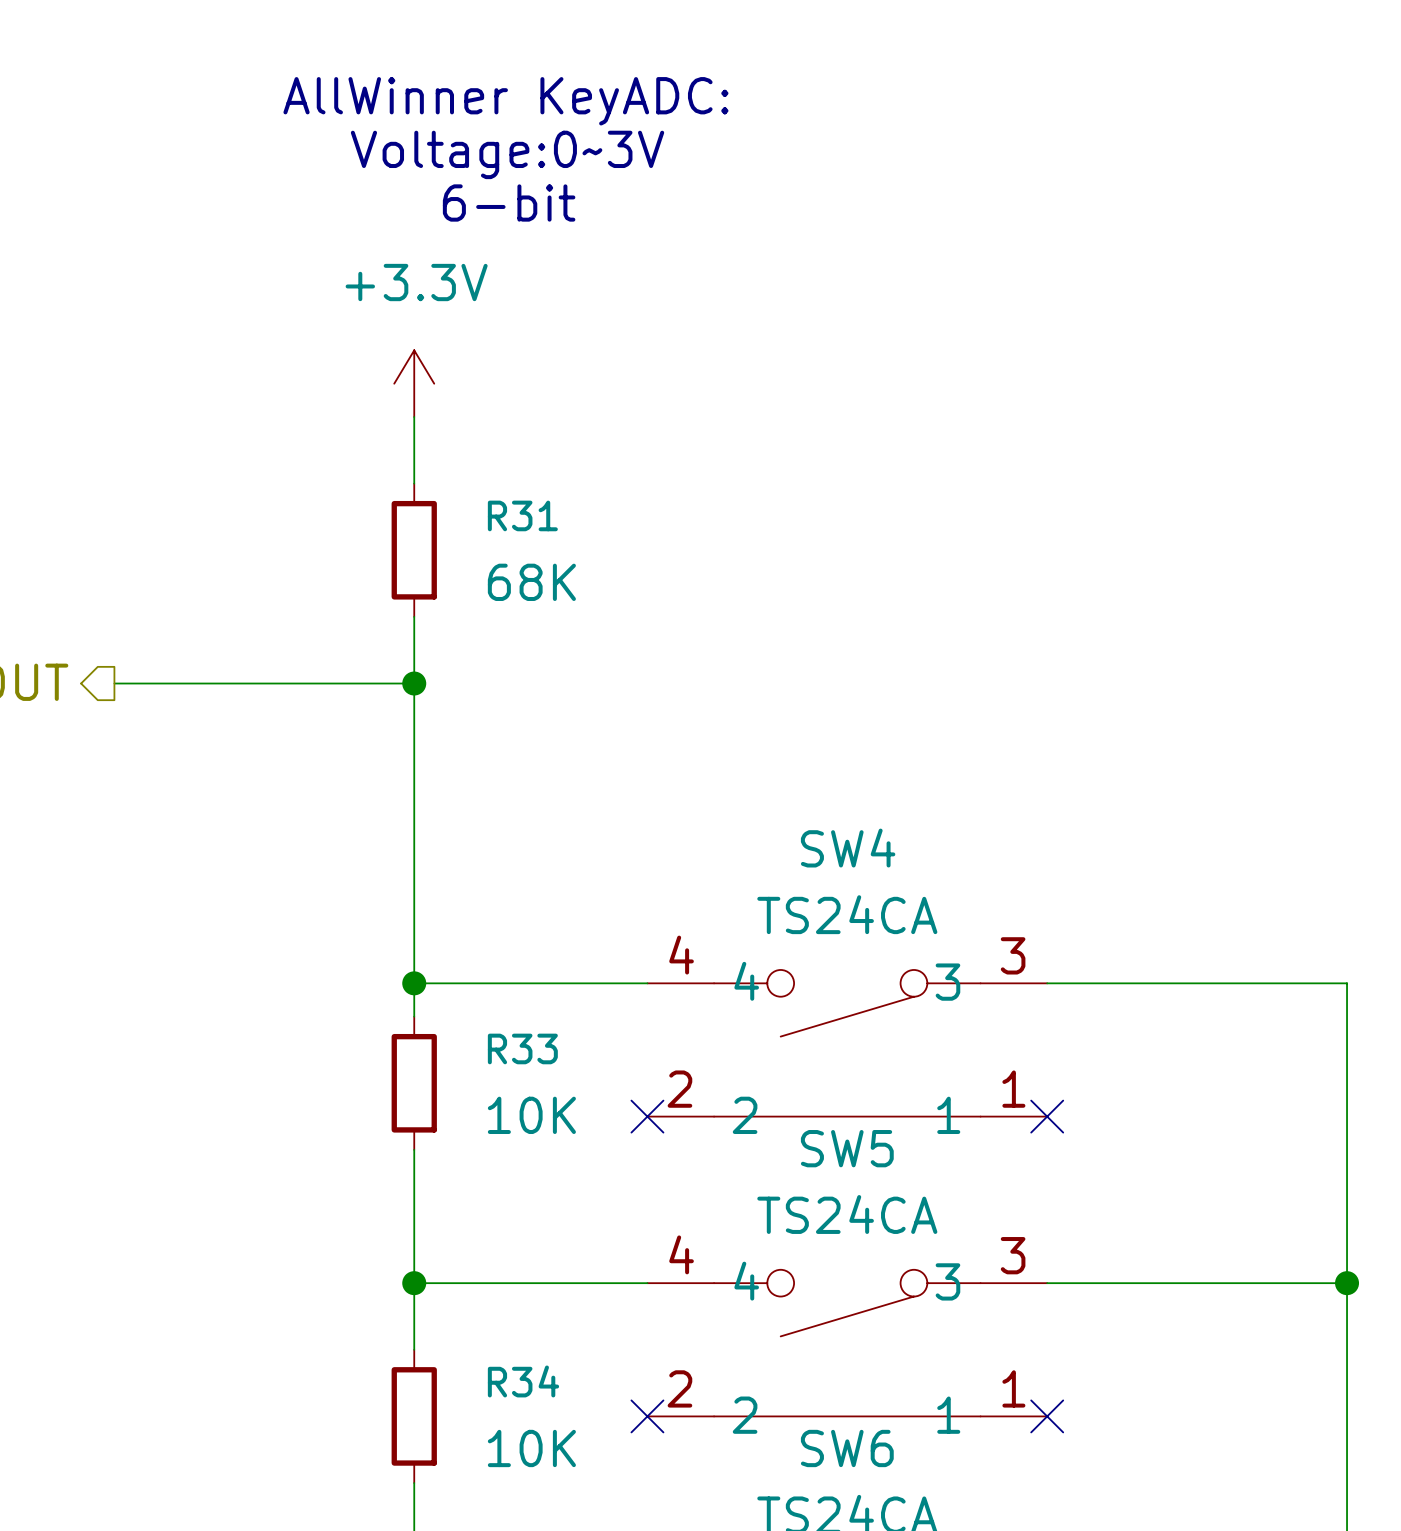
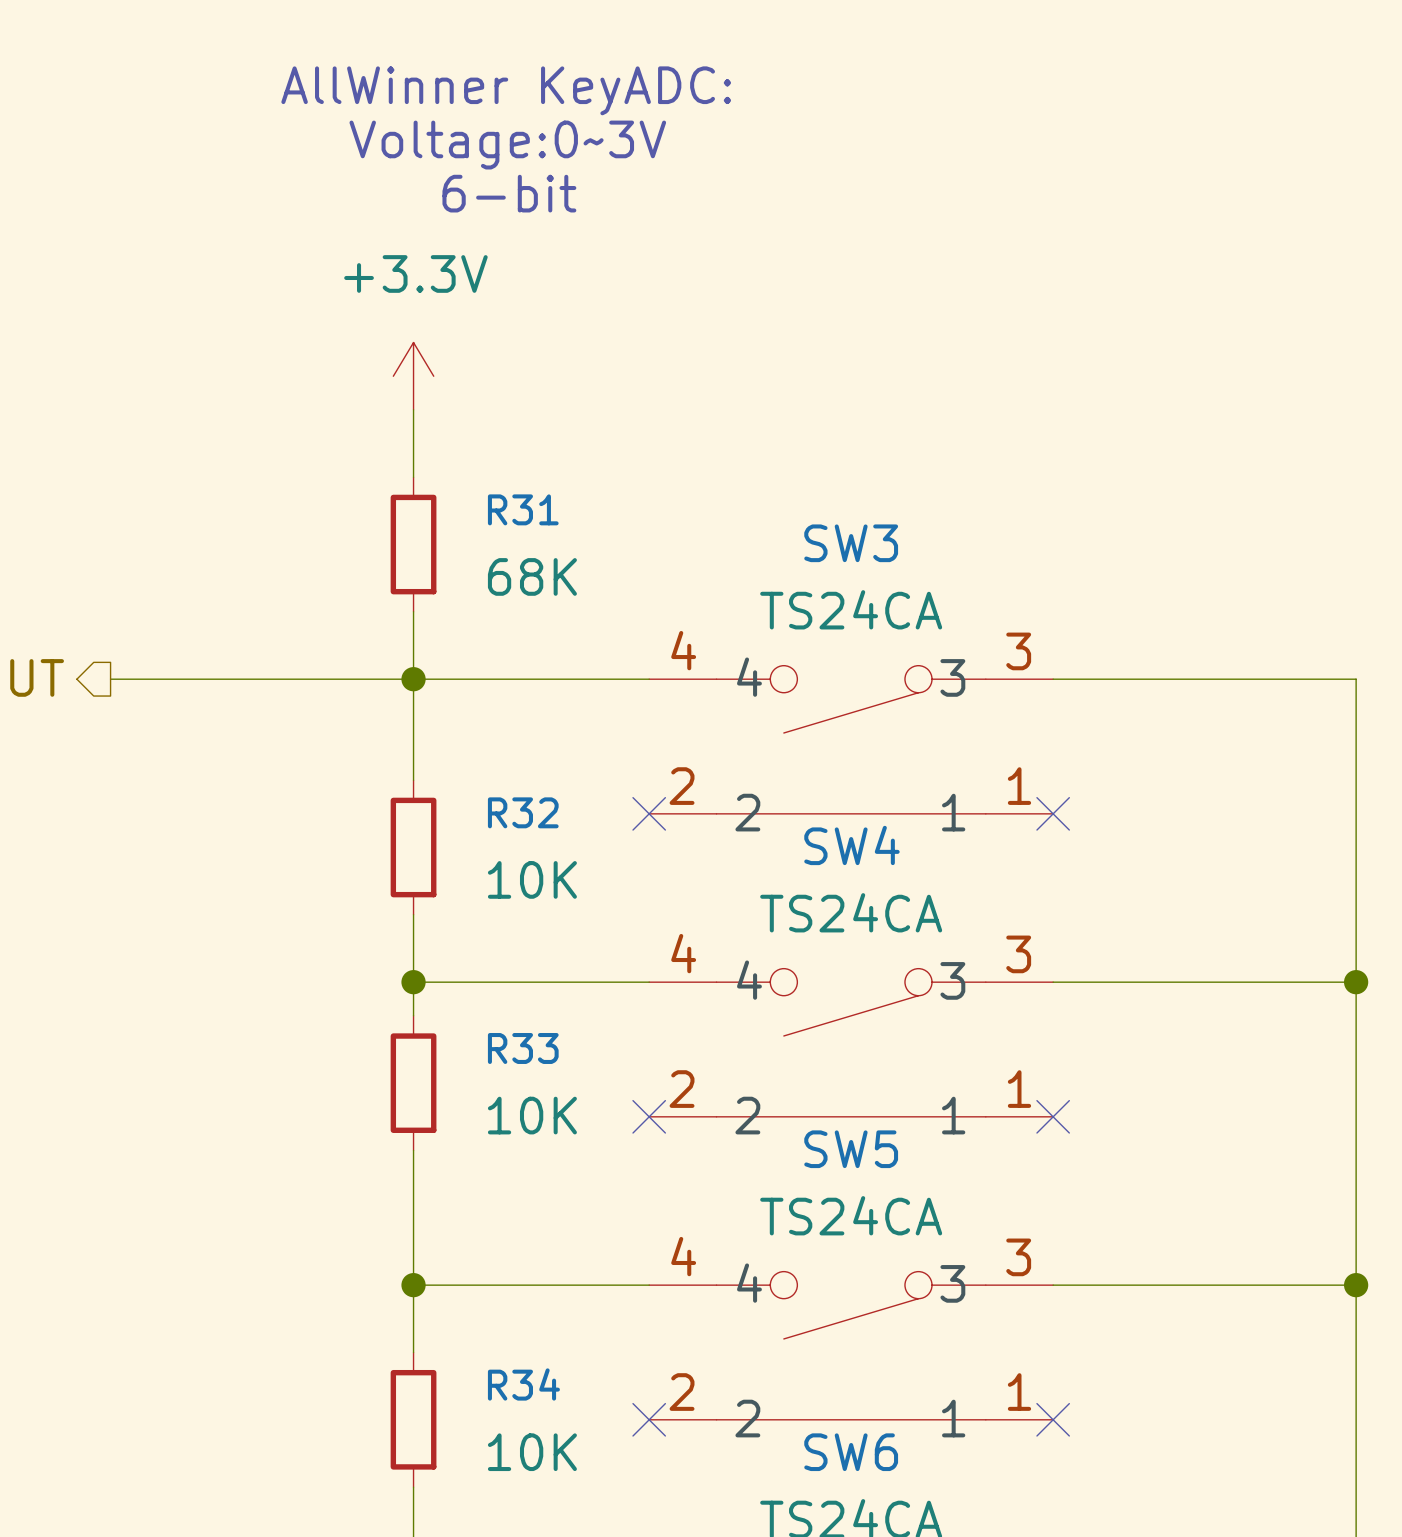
wire: none -> (413, 679) (649, 679)
wire: none -> (1053, 679) (1356, 679) (1356, 982)
SW3: none -> TS24CA (851, 739)
wire: (414, 783) (414, 916) -> none
no-connect mark: none -> (649, 813)
no-connect mark: none -> (1053, 813)
R32: none -> 10K (413, 847)
junction: none -> (1356, 982)

